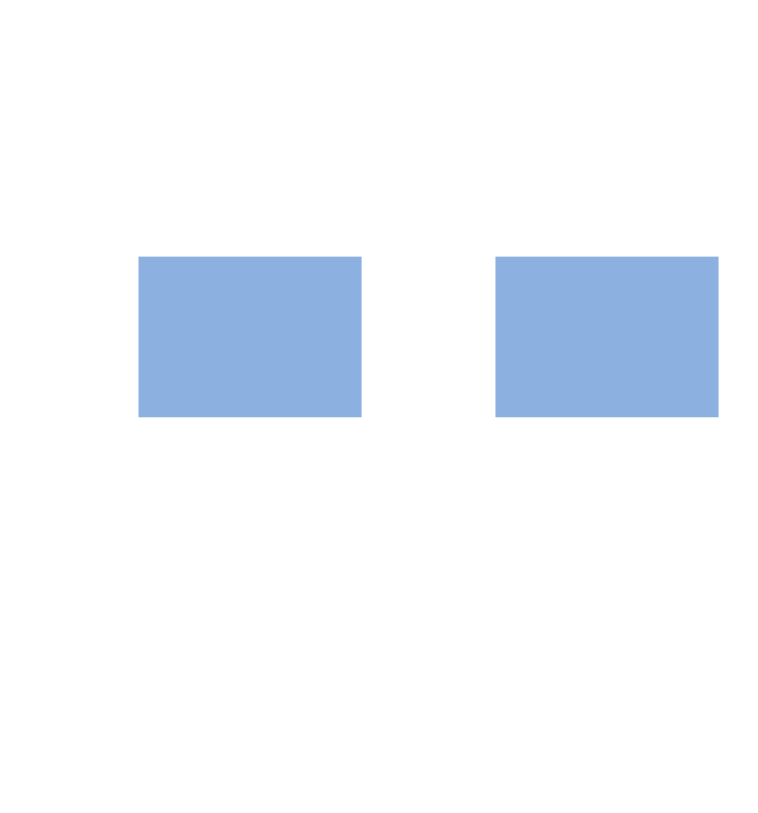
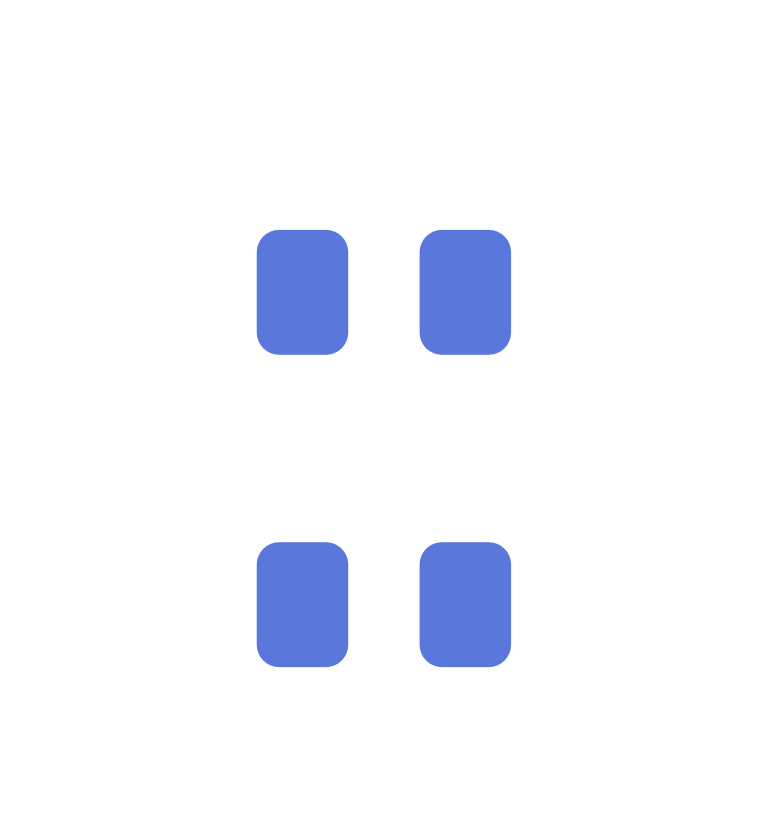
part footprint: [138, 256, 719, 418] -> [256, 229, 512, 355]
part: none -> (383, 604)

